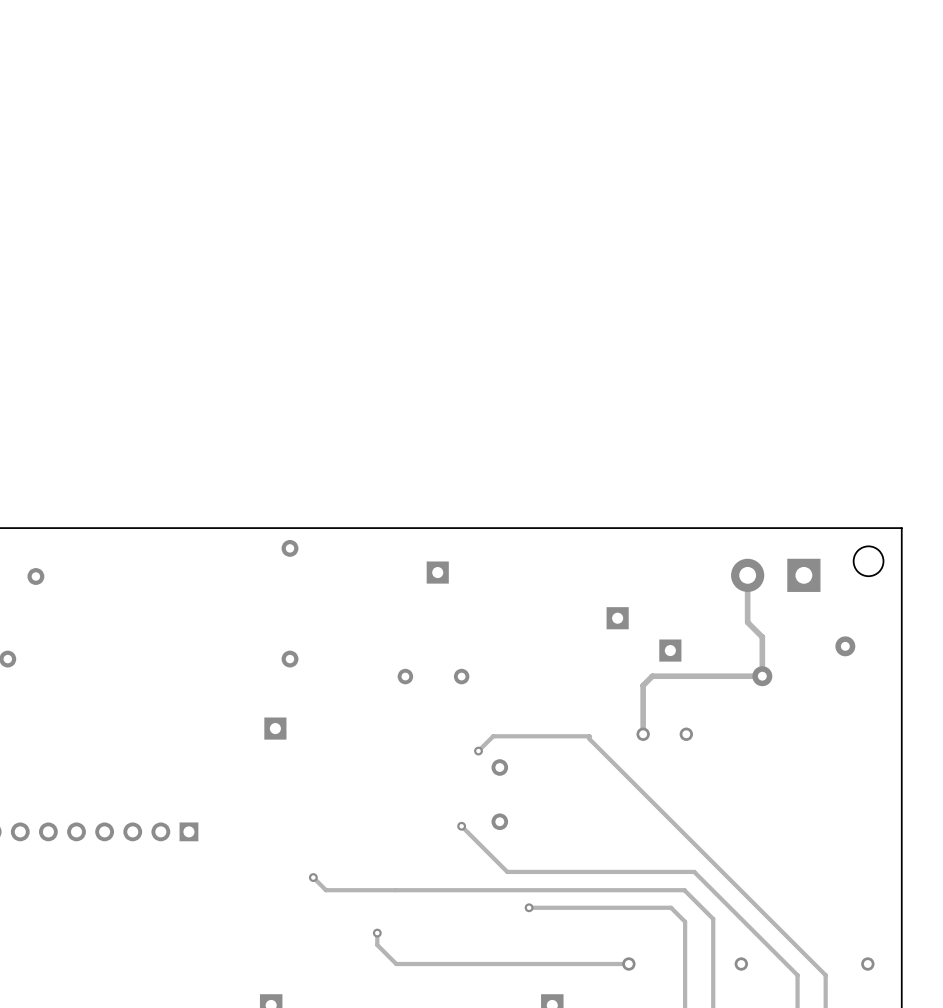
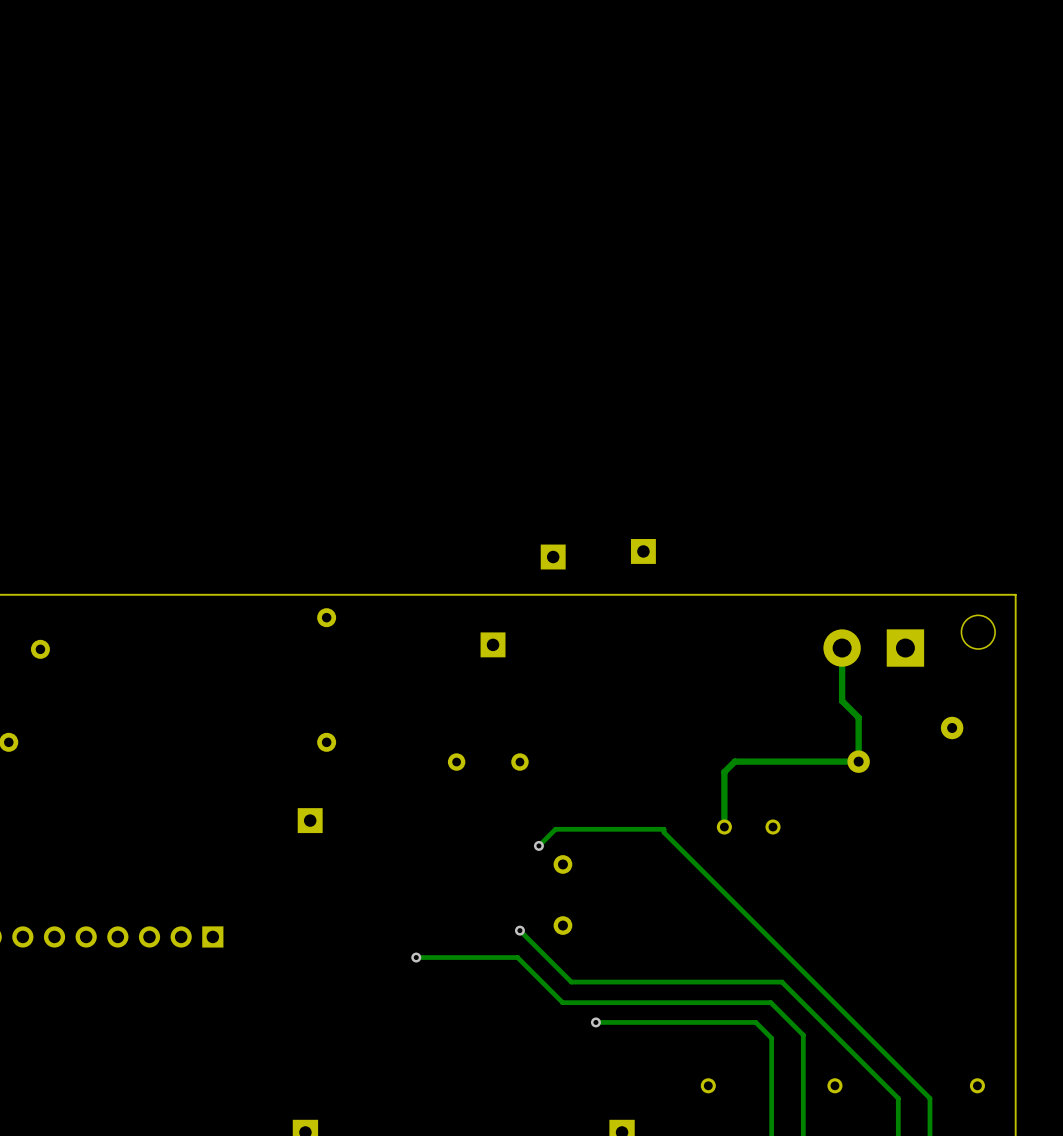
part: none -> (643, 551)
part: none -> (553, 557)
part: (617, 618) -> none
part: (670, 650) -> none
via: none -> (416, 957)
track: (313, 877) (326, 890) (499, 890) -> (416, 957) (517, 957) (562, 1002)
via: (313, 877) -> none
track: (377, 933) (377, 945) (396, 964) (628, 964) -> none
via: (377, 933) -> none

